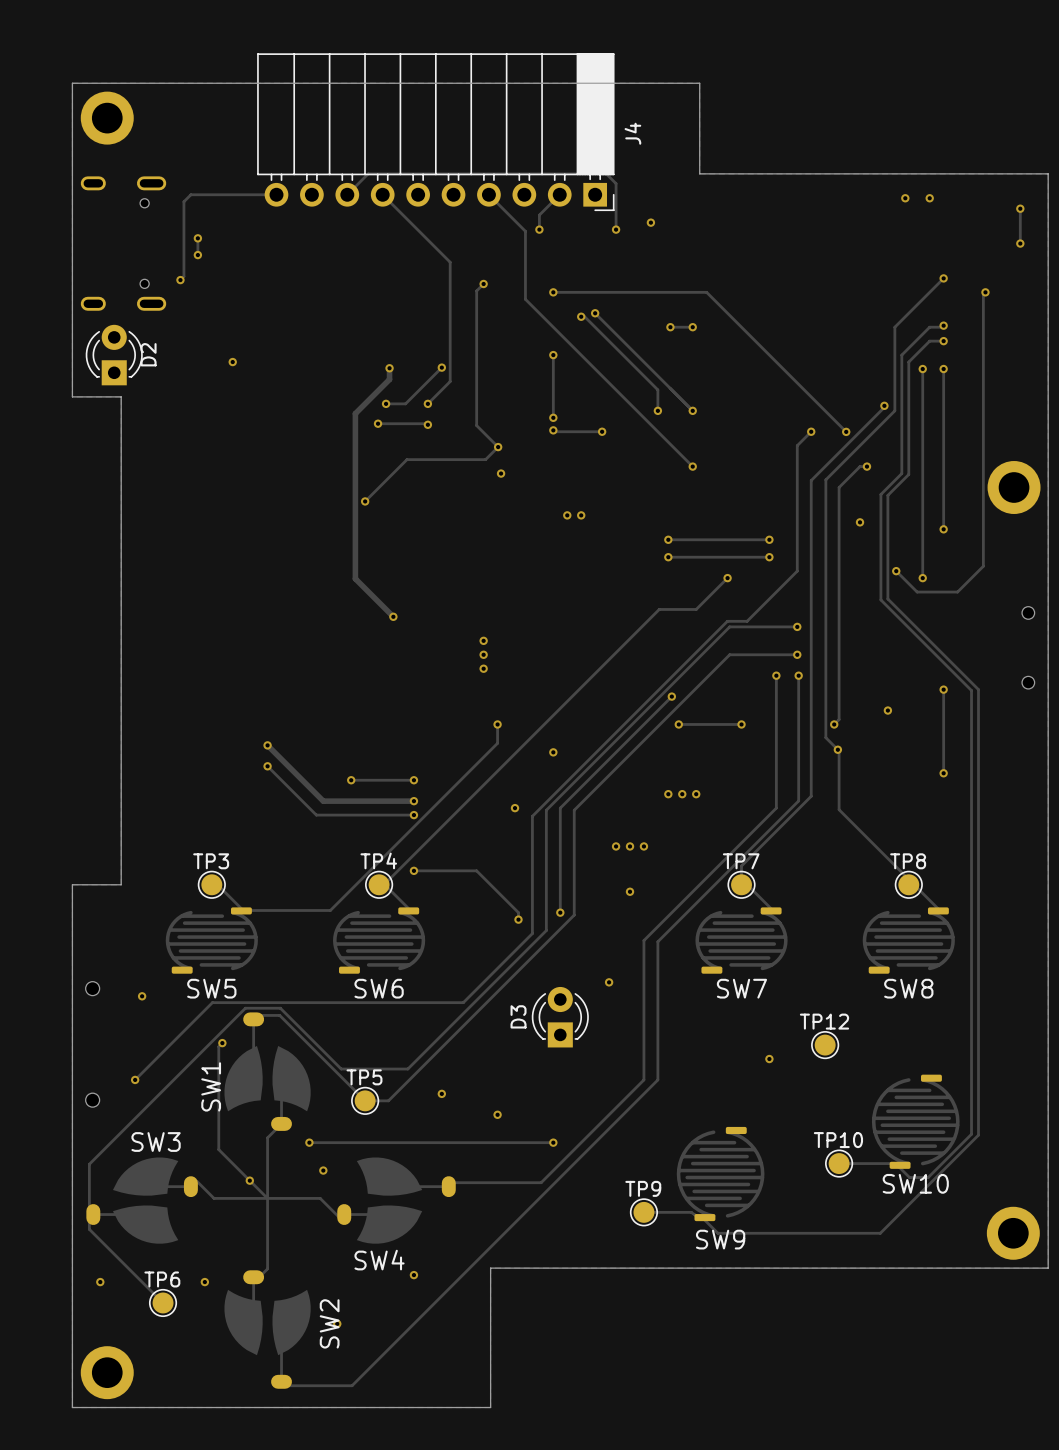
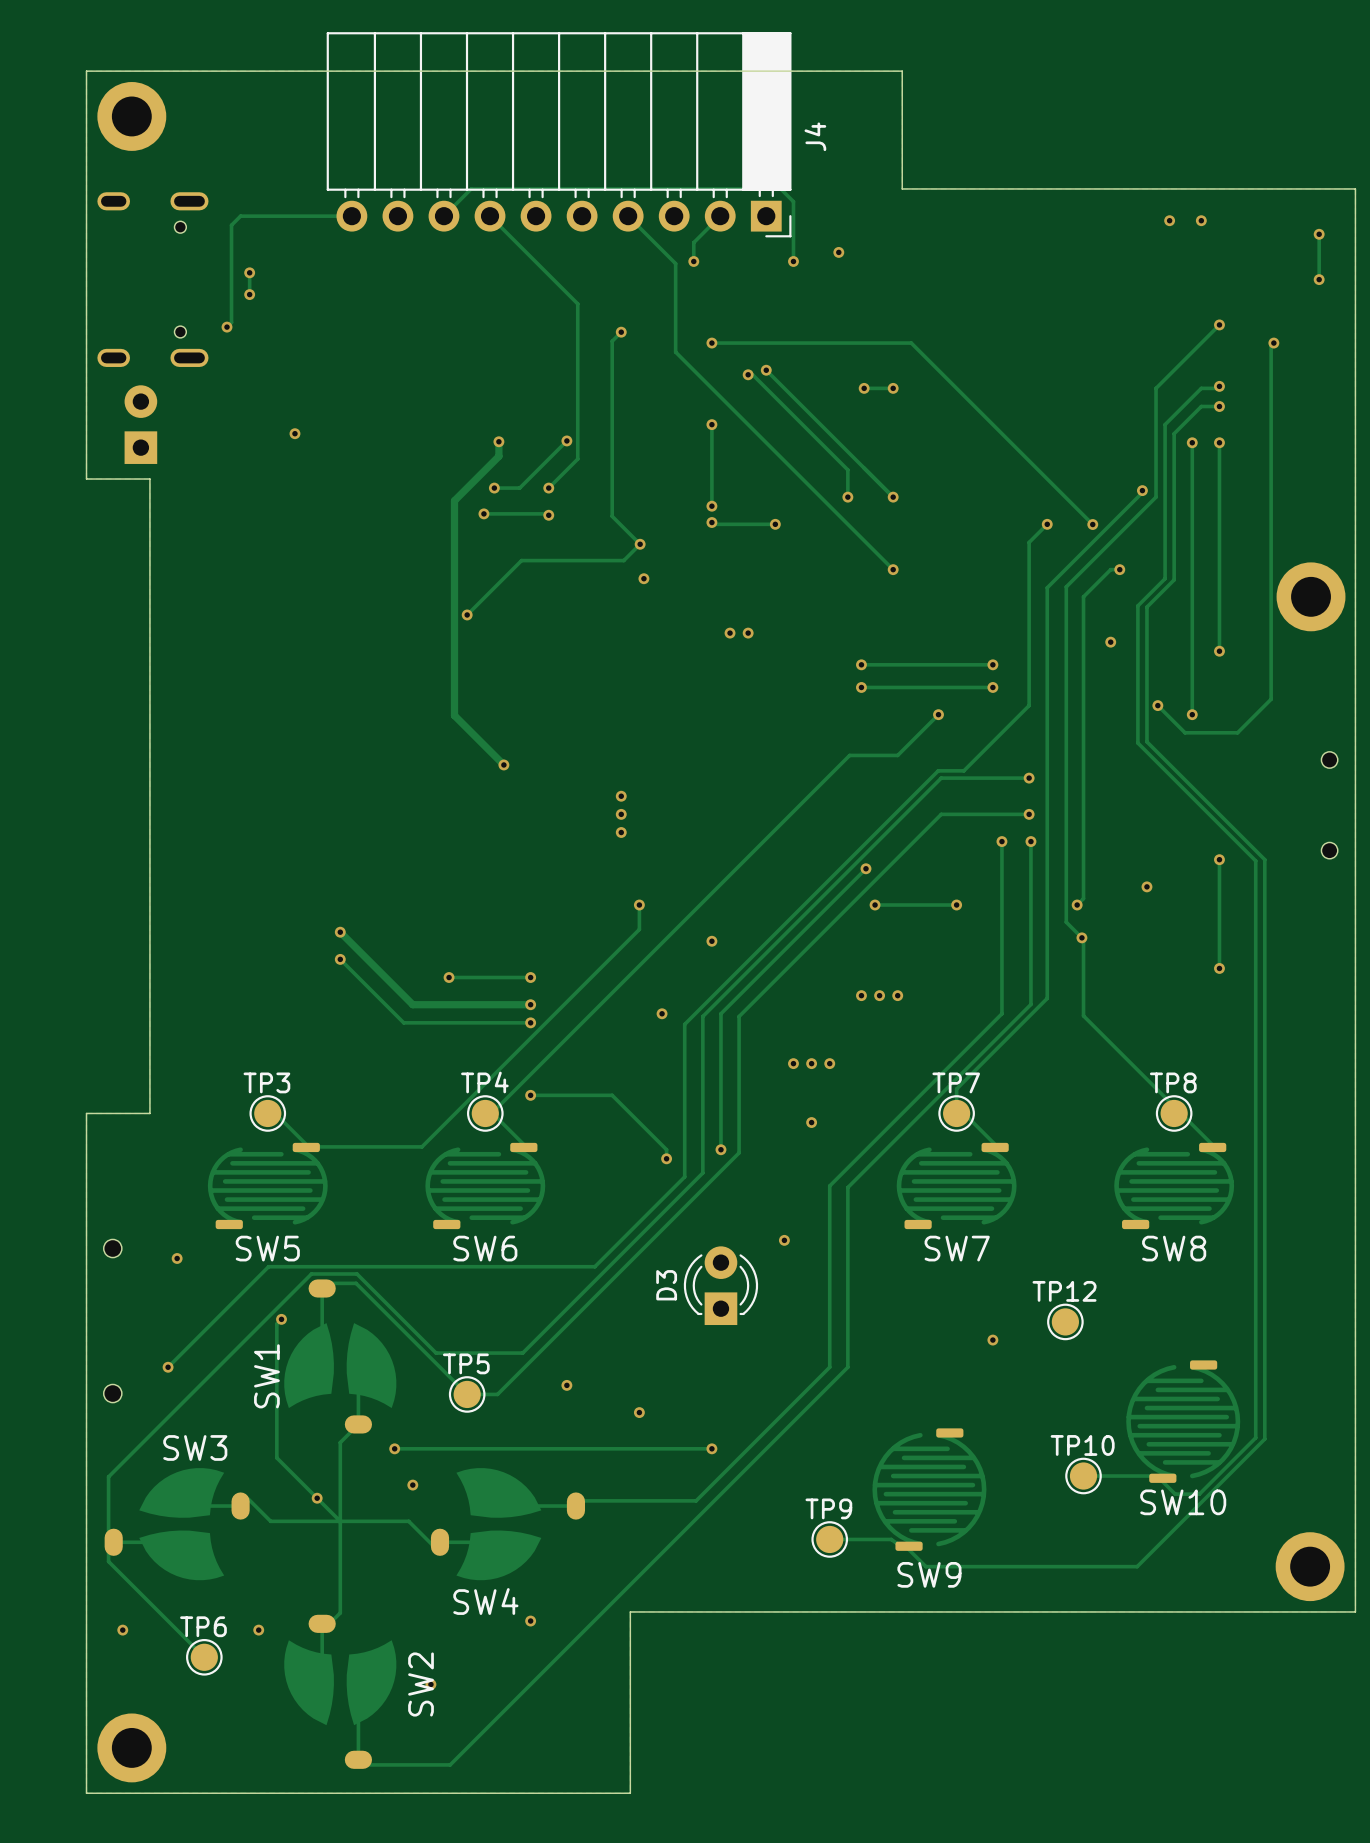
D2 side: top (114, 355) -> bottom (140, 424)

